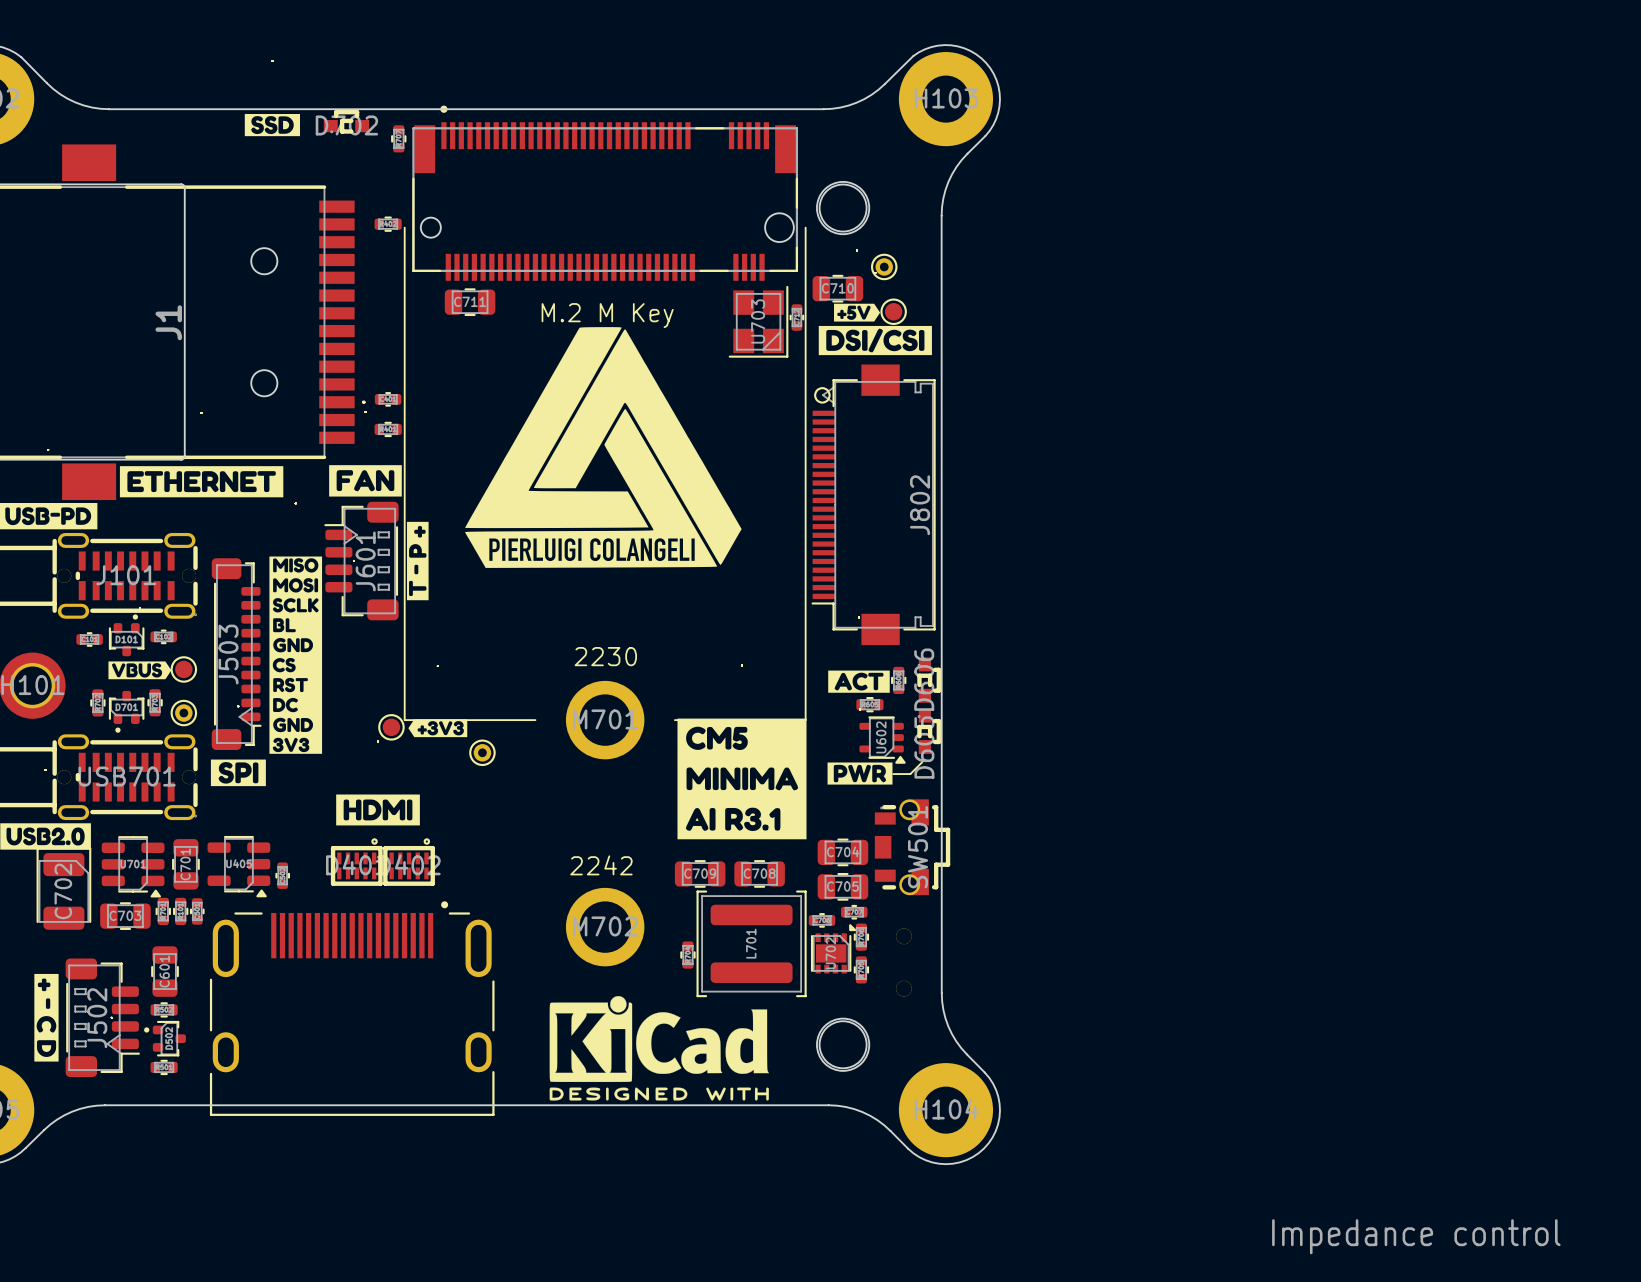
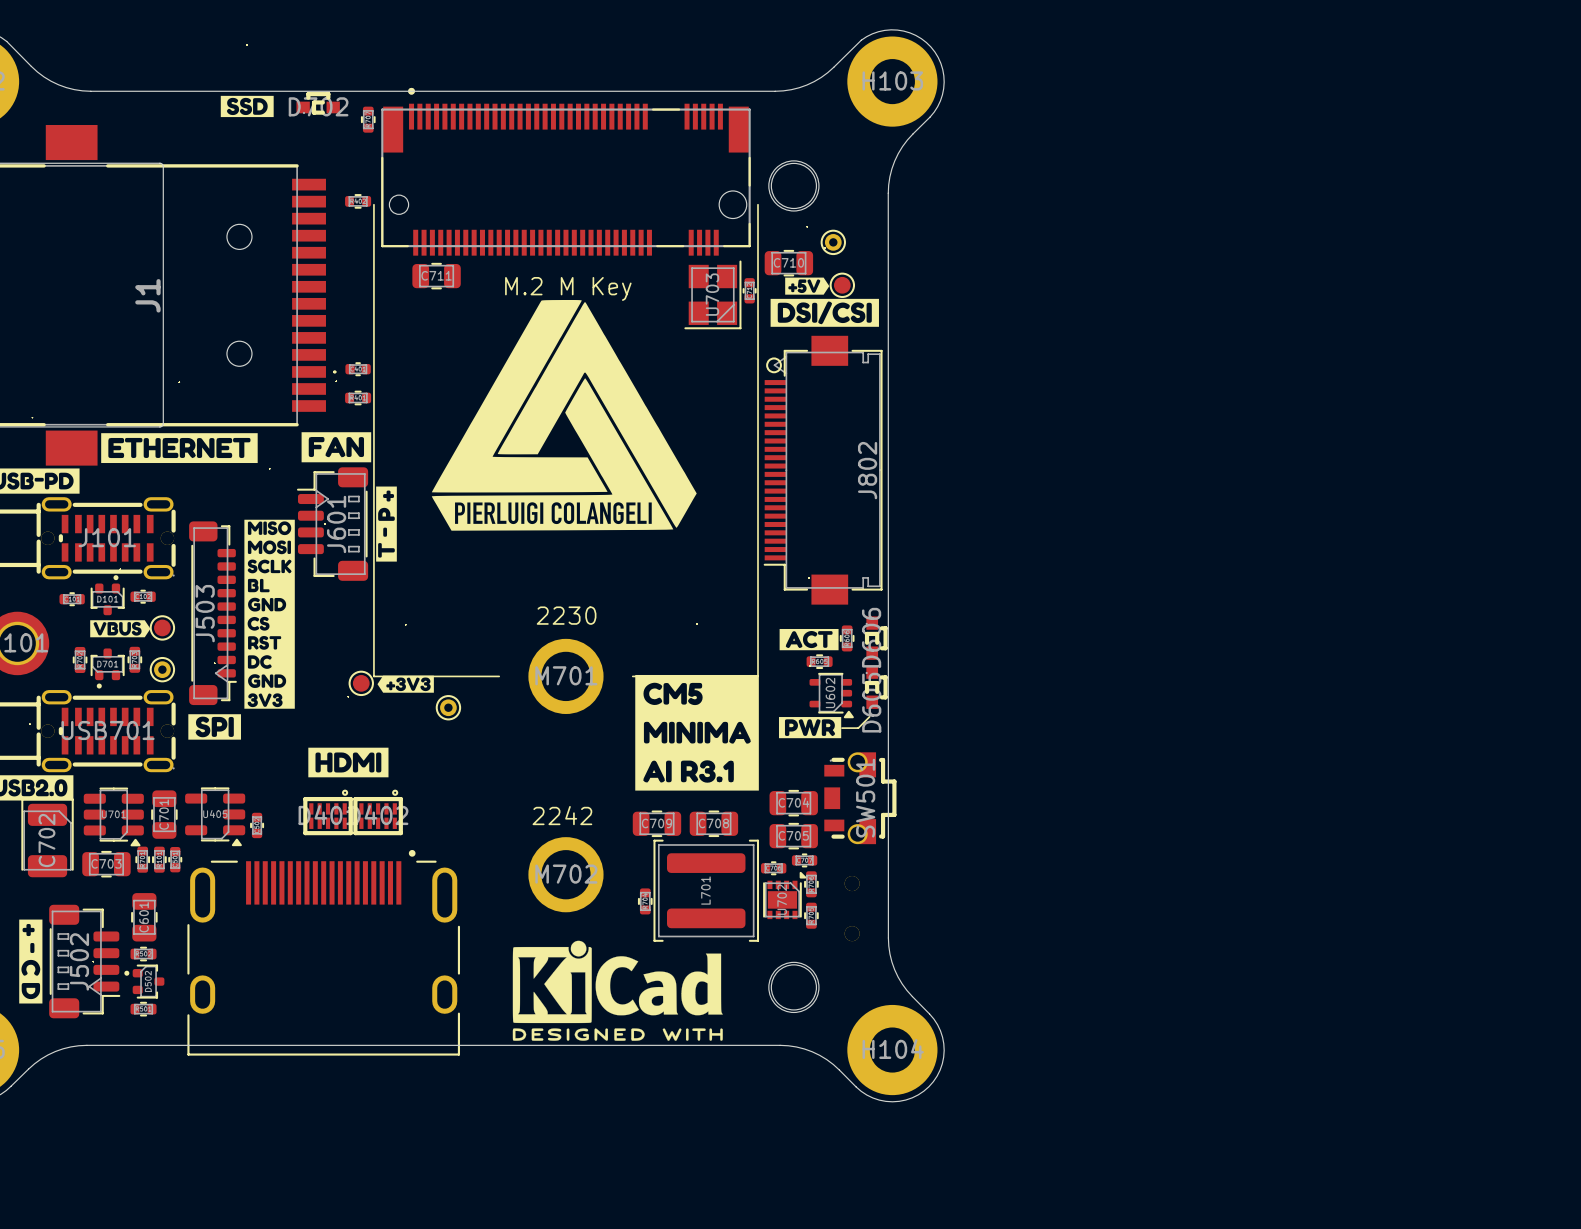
text: Impedance control (1416, 1236) -> none

